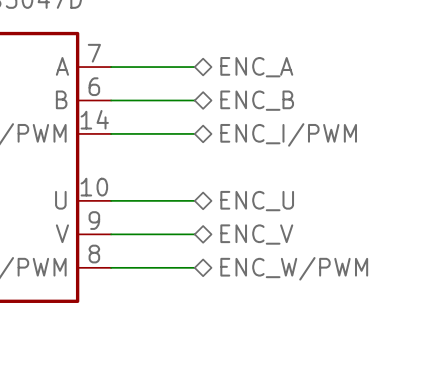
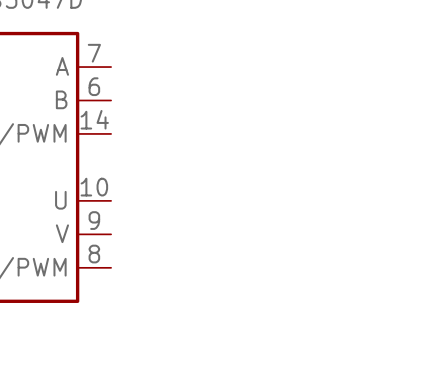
wire: (111, 67) (194, 67) -> none
hierarchical label: ENC_A (256, 67) -> none
wire: (111, 100) (194, 100) -> none
hierarchical label: ENC_B (257, 100) -> none
wire: (111, 133) (194, 133) -> none
hierarchical label: ENC_I/PWM (288, 134) -> none
wire: (111, 200) (194, 200) -> none
hierarchical label: ENC_U (257, 201) -> none
wire: (111, 234) (194, 234) -> none
hierarchical label: ENC_V (256, 234) -> none
wire: (111, 267) (194, 267) -> none
hierarchical label: ENC_W/PWM (294, 268) -> none

